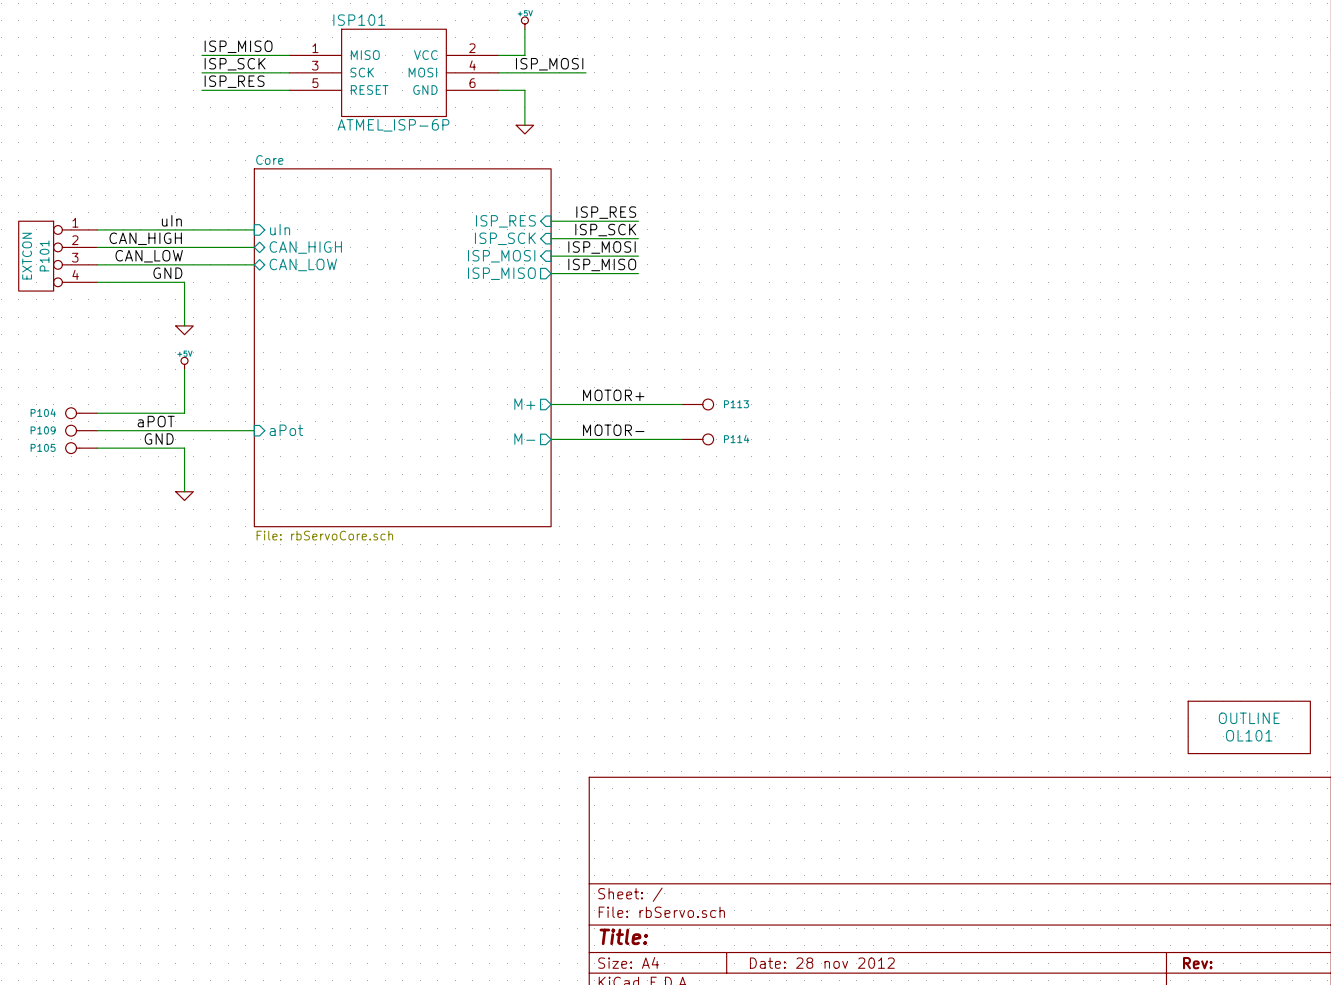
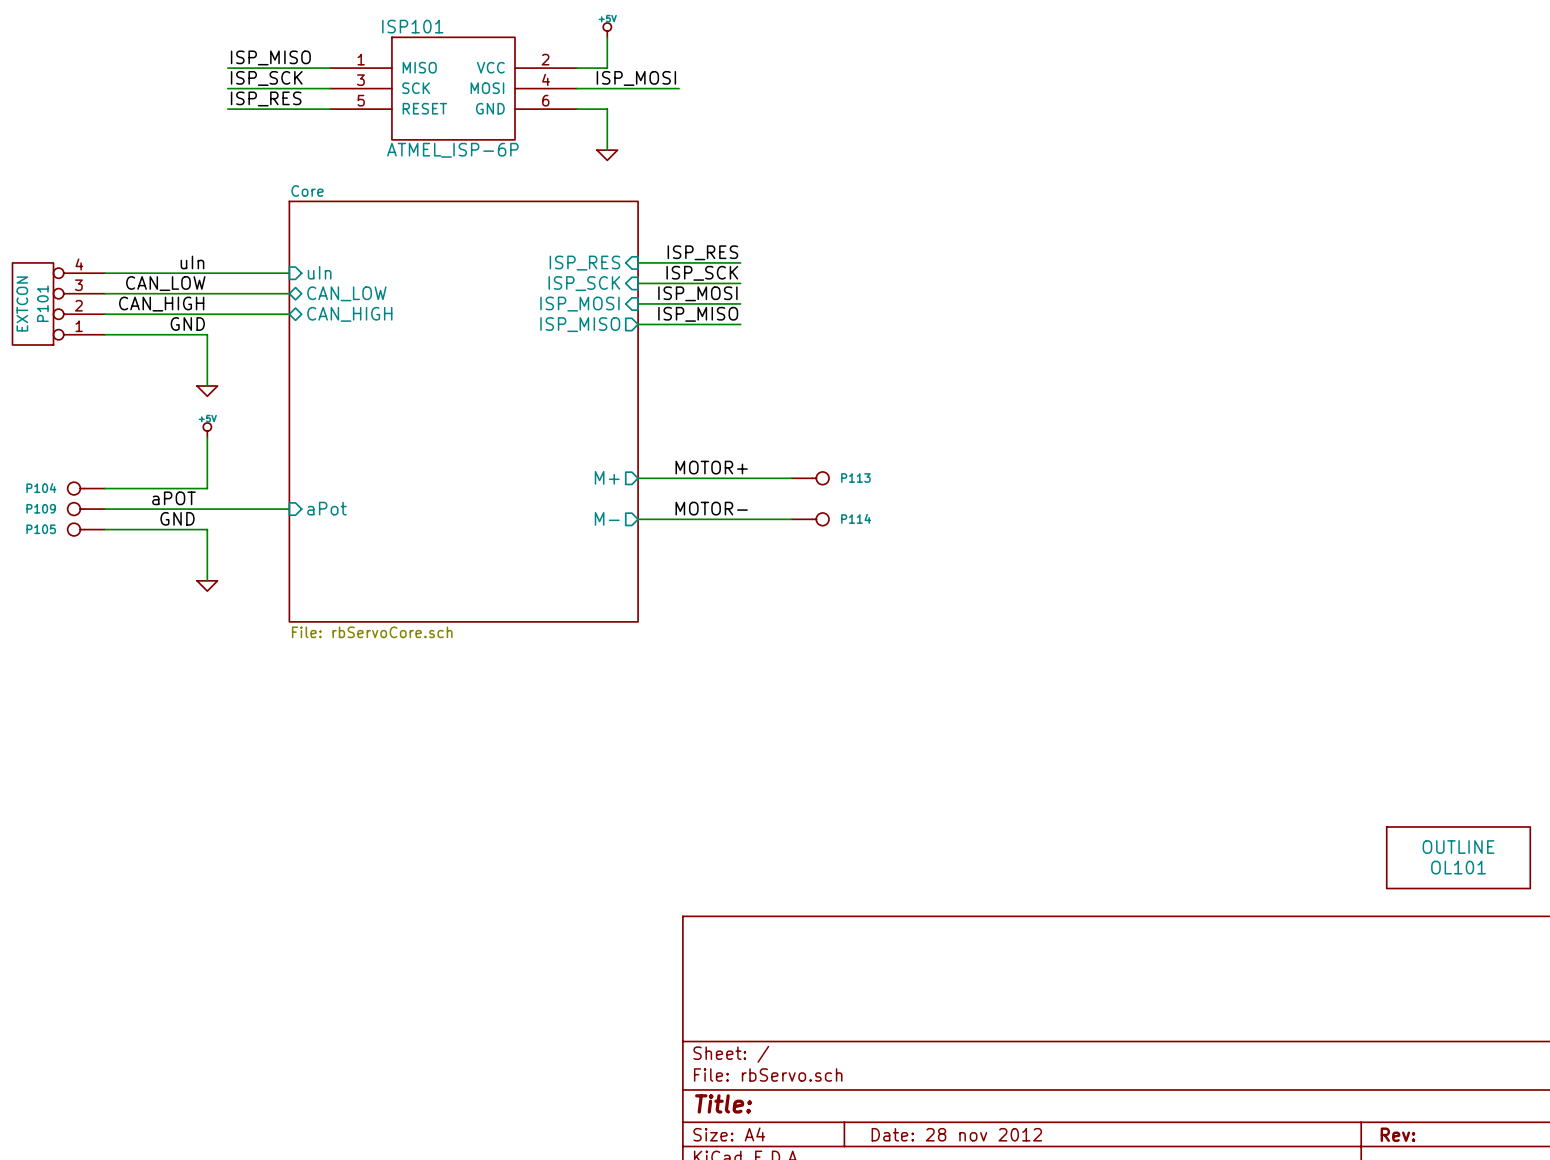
label: CAN_HIGH (145, 238) -> CAN_LOW (165, 283)
sheet pin: CAN_HIGH (305, 247) -> CAN_LOW (346, 293)
P101 flip: as is (36, 256) -> up-down (32, 303)
label: CAN_LOW (149, 256) -> CAN_HIGH (161, 304)
sheet pin: CAN_LOW (303, 264) -> CAN_HIGH (349, 314)

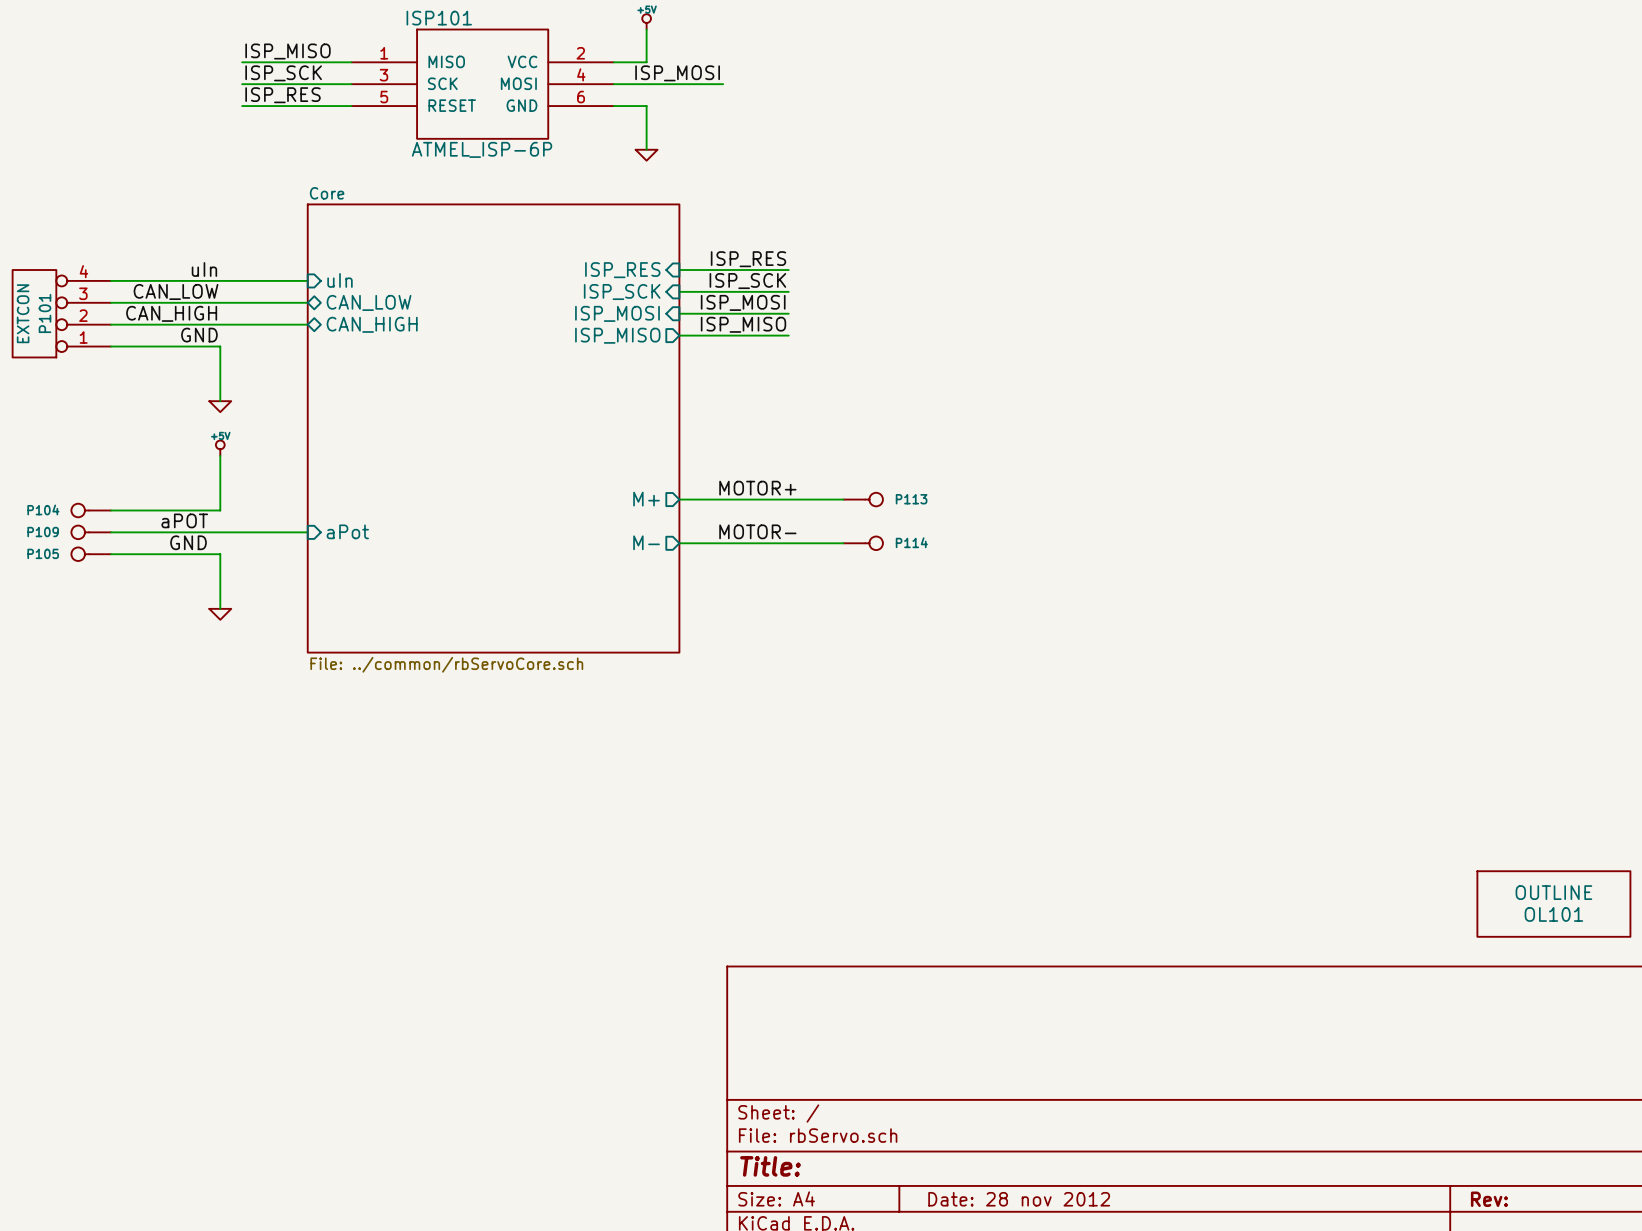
sheet Core value: File: rbServoCore.sch (372, 632) -> File: ../common/rbServoCore.sch (446, 664)

